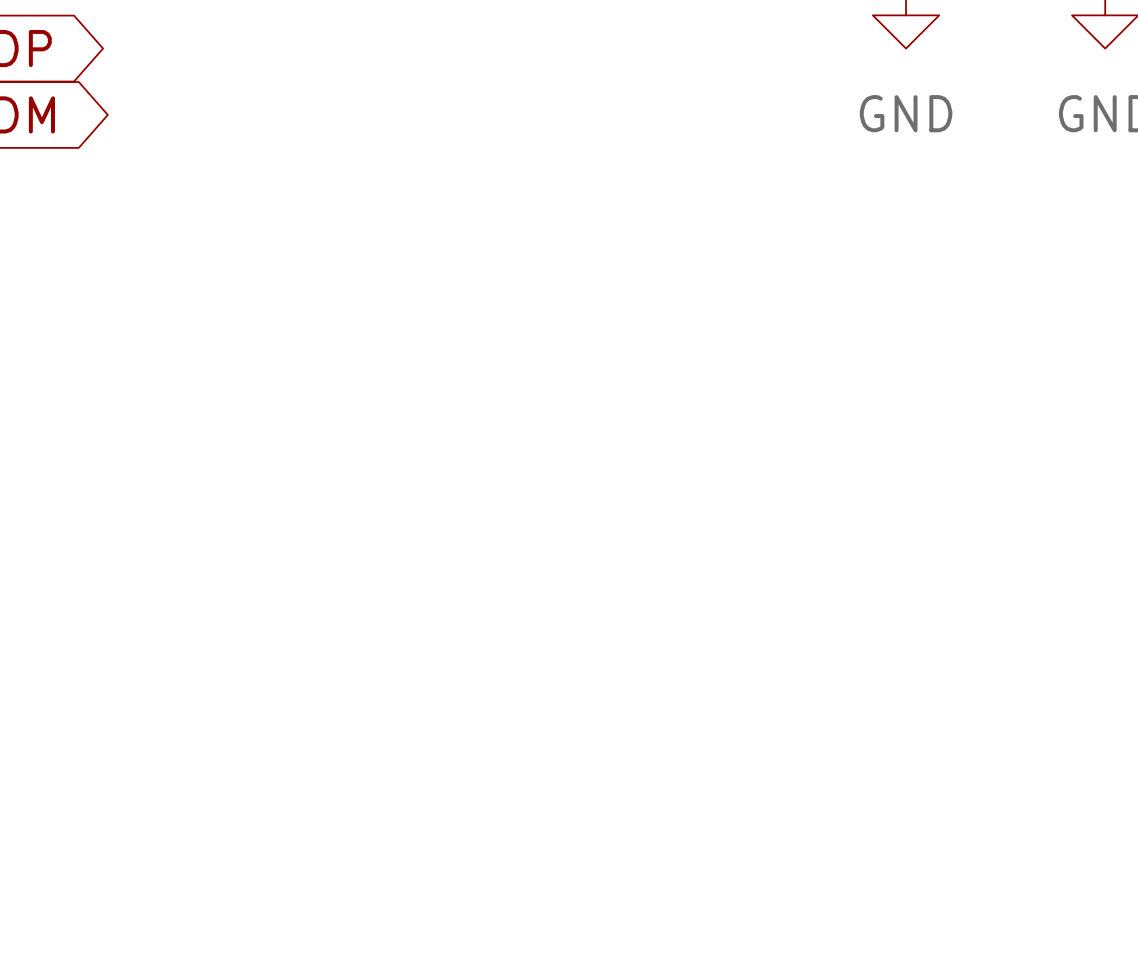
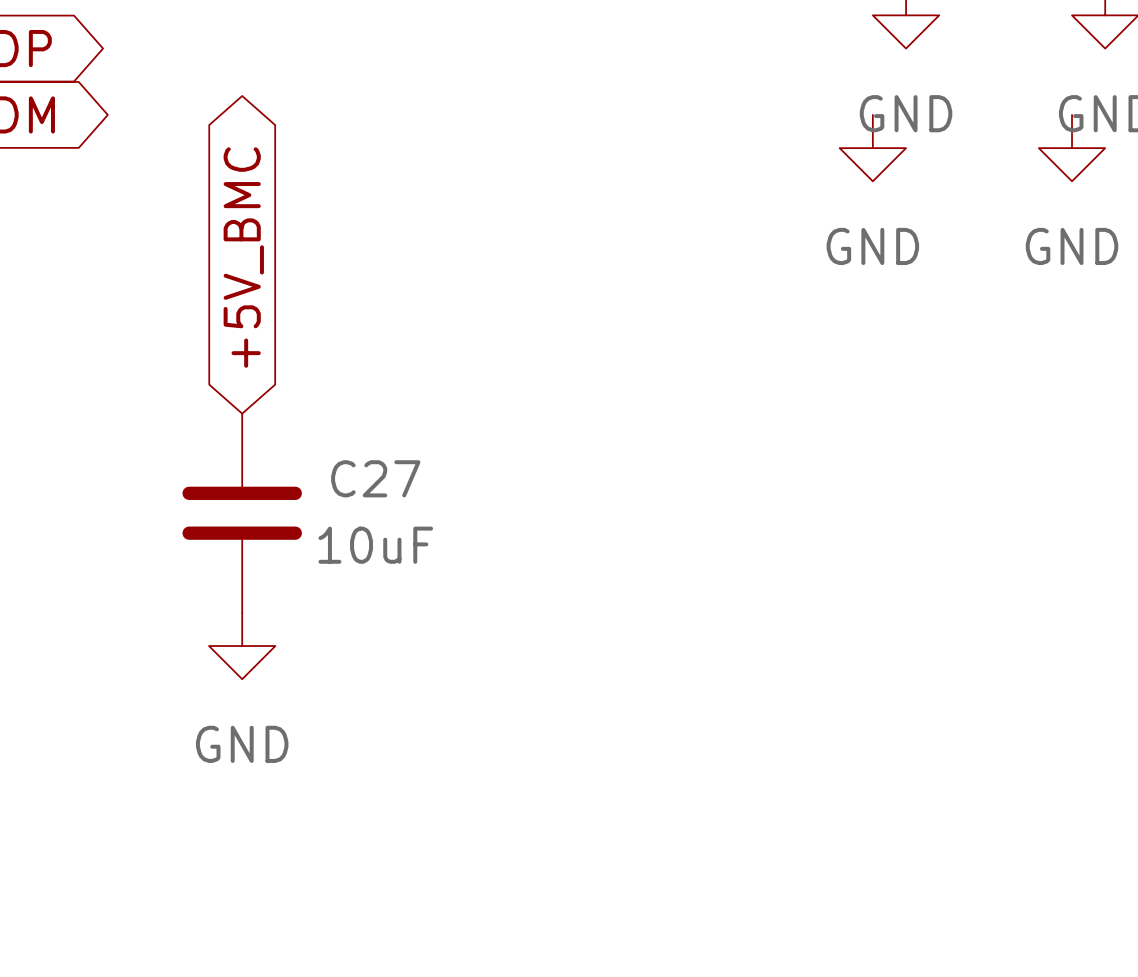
power symbol: none -> GND (872, 148)
power symbol: none -> GND (1072, 148)
global label: none -> +5V_BMC (243, 257)
C27: none -> 10uF (242, 513)
power symbol: none -> GND (242, 646)

